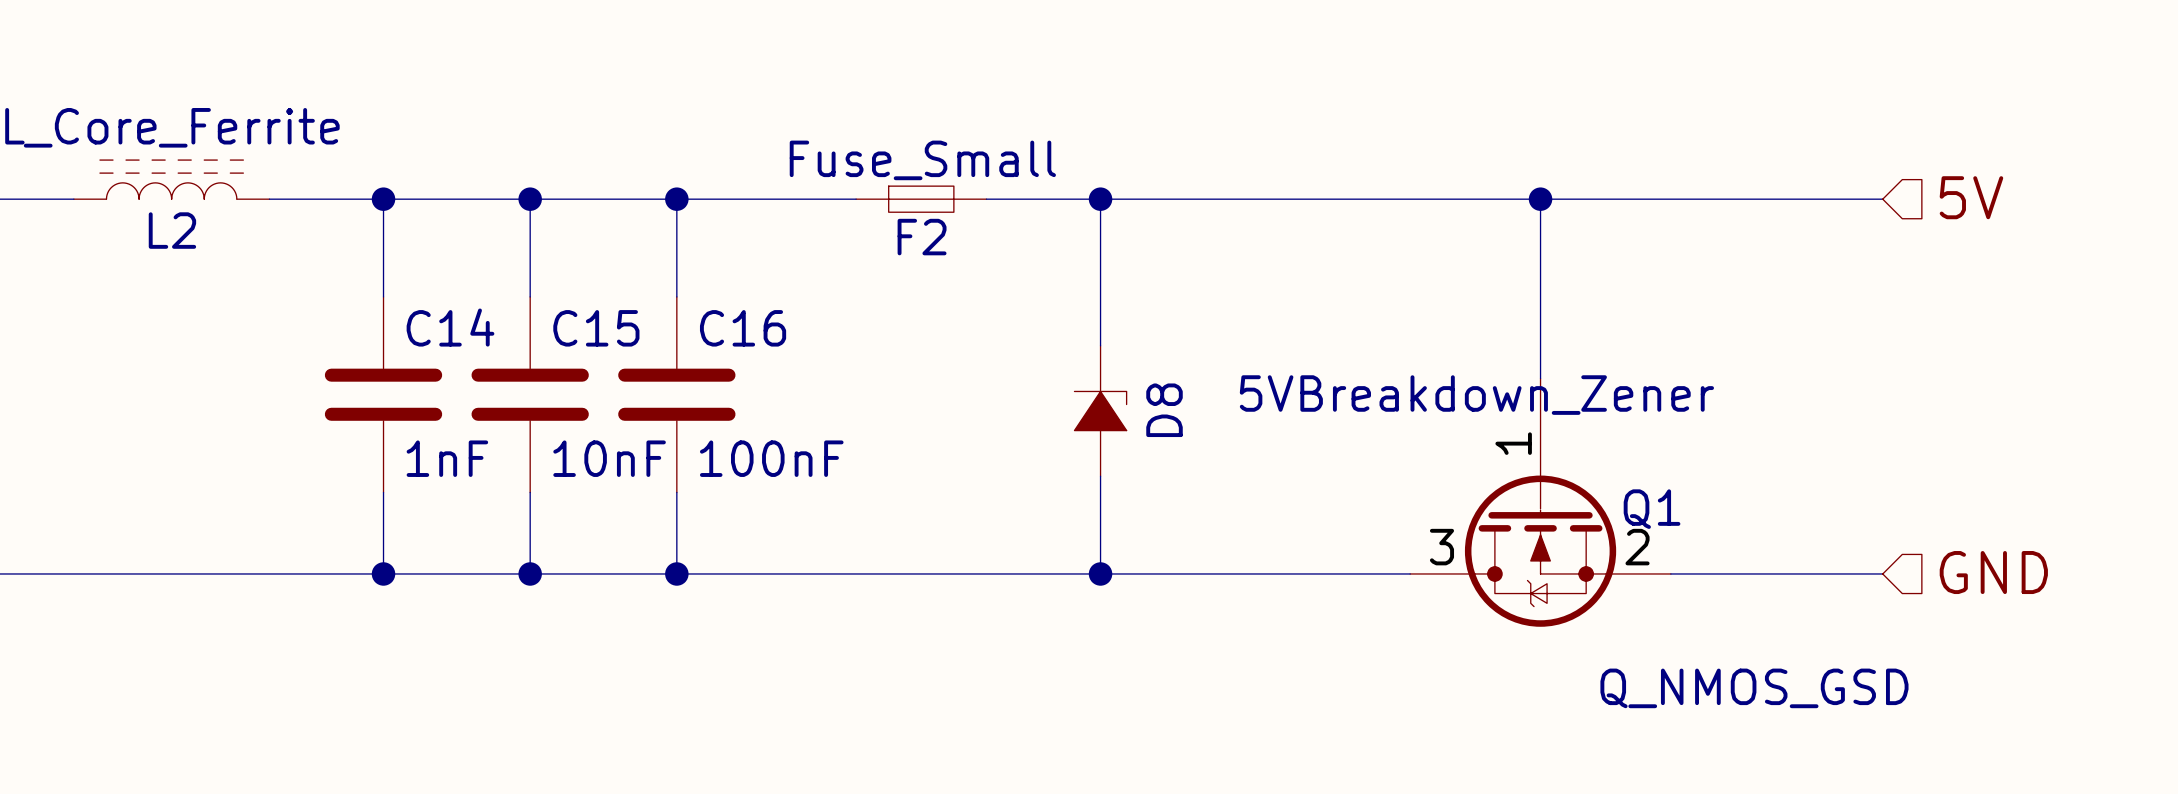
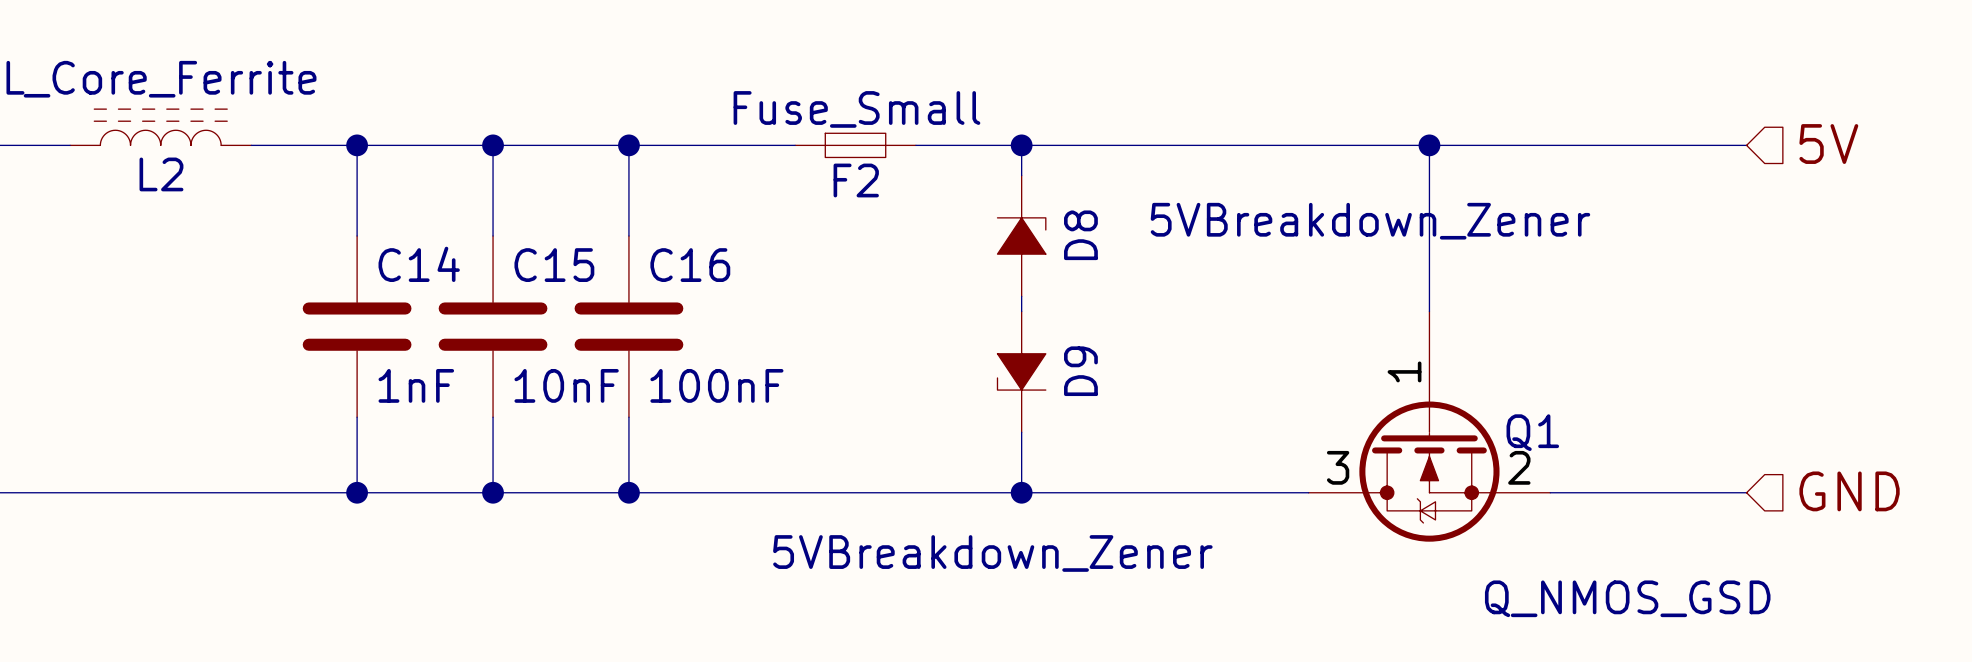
D8 position: (1100, 411) -> (1021, 235)
D9: none -> 5VBreakdown_Zener (1021, 371)

